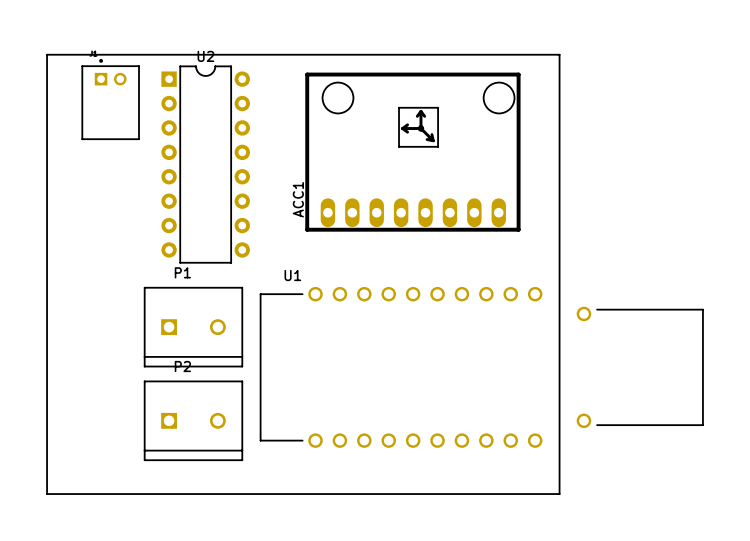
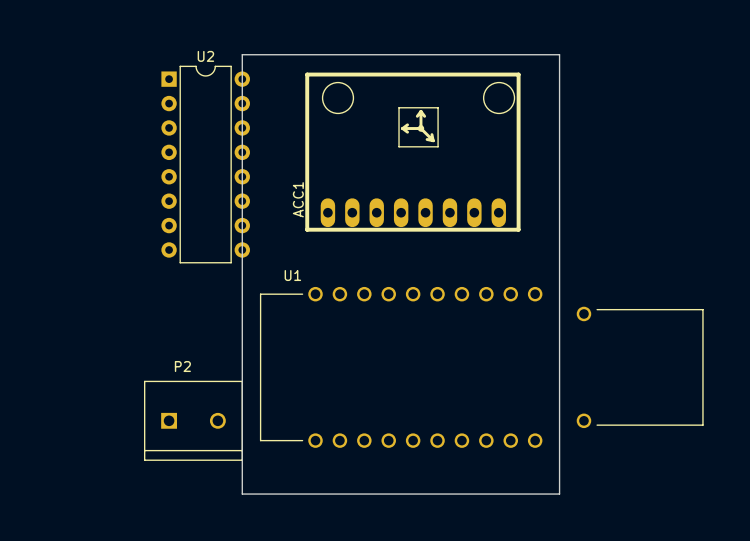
board edge: (242, 54) (47, 54) (47, 494) (242, 494) -> (242, 54) (242, 494)
part: (110, 99) -> none
P1: (193, 327) -> none

